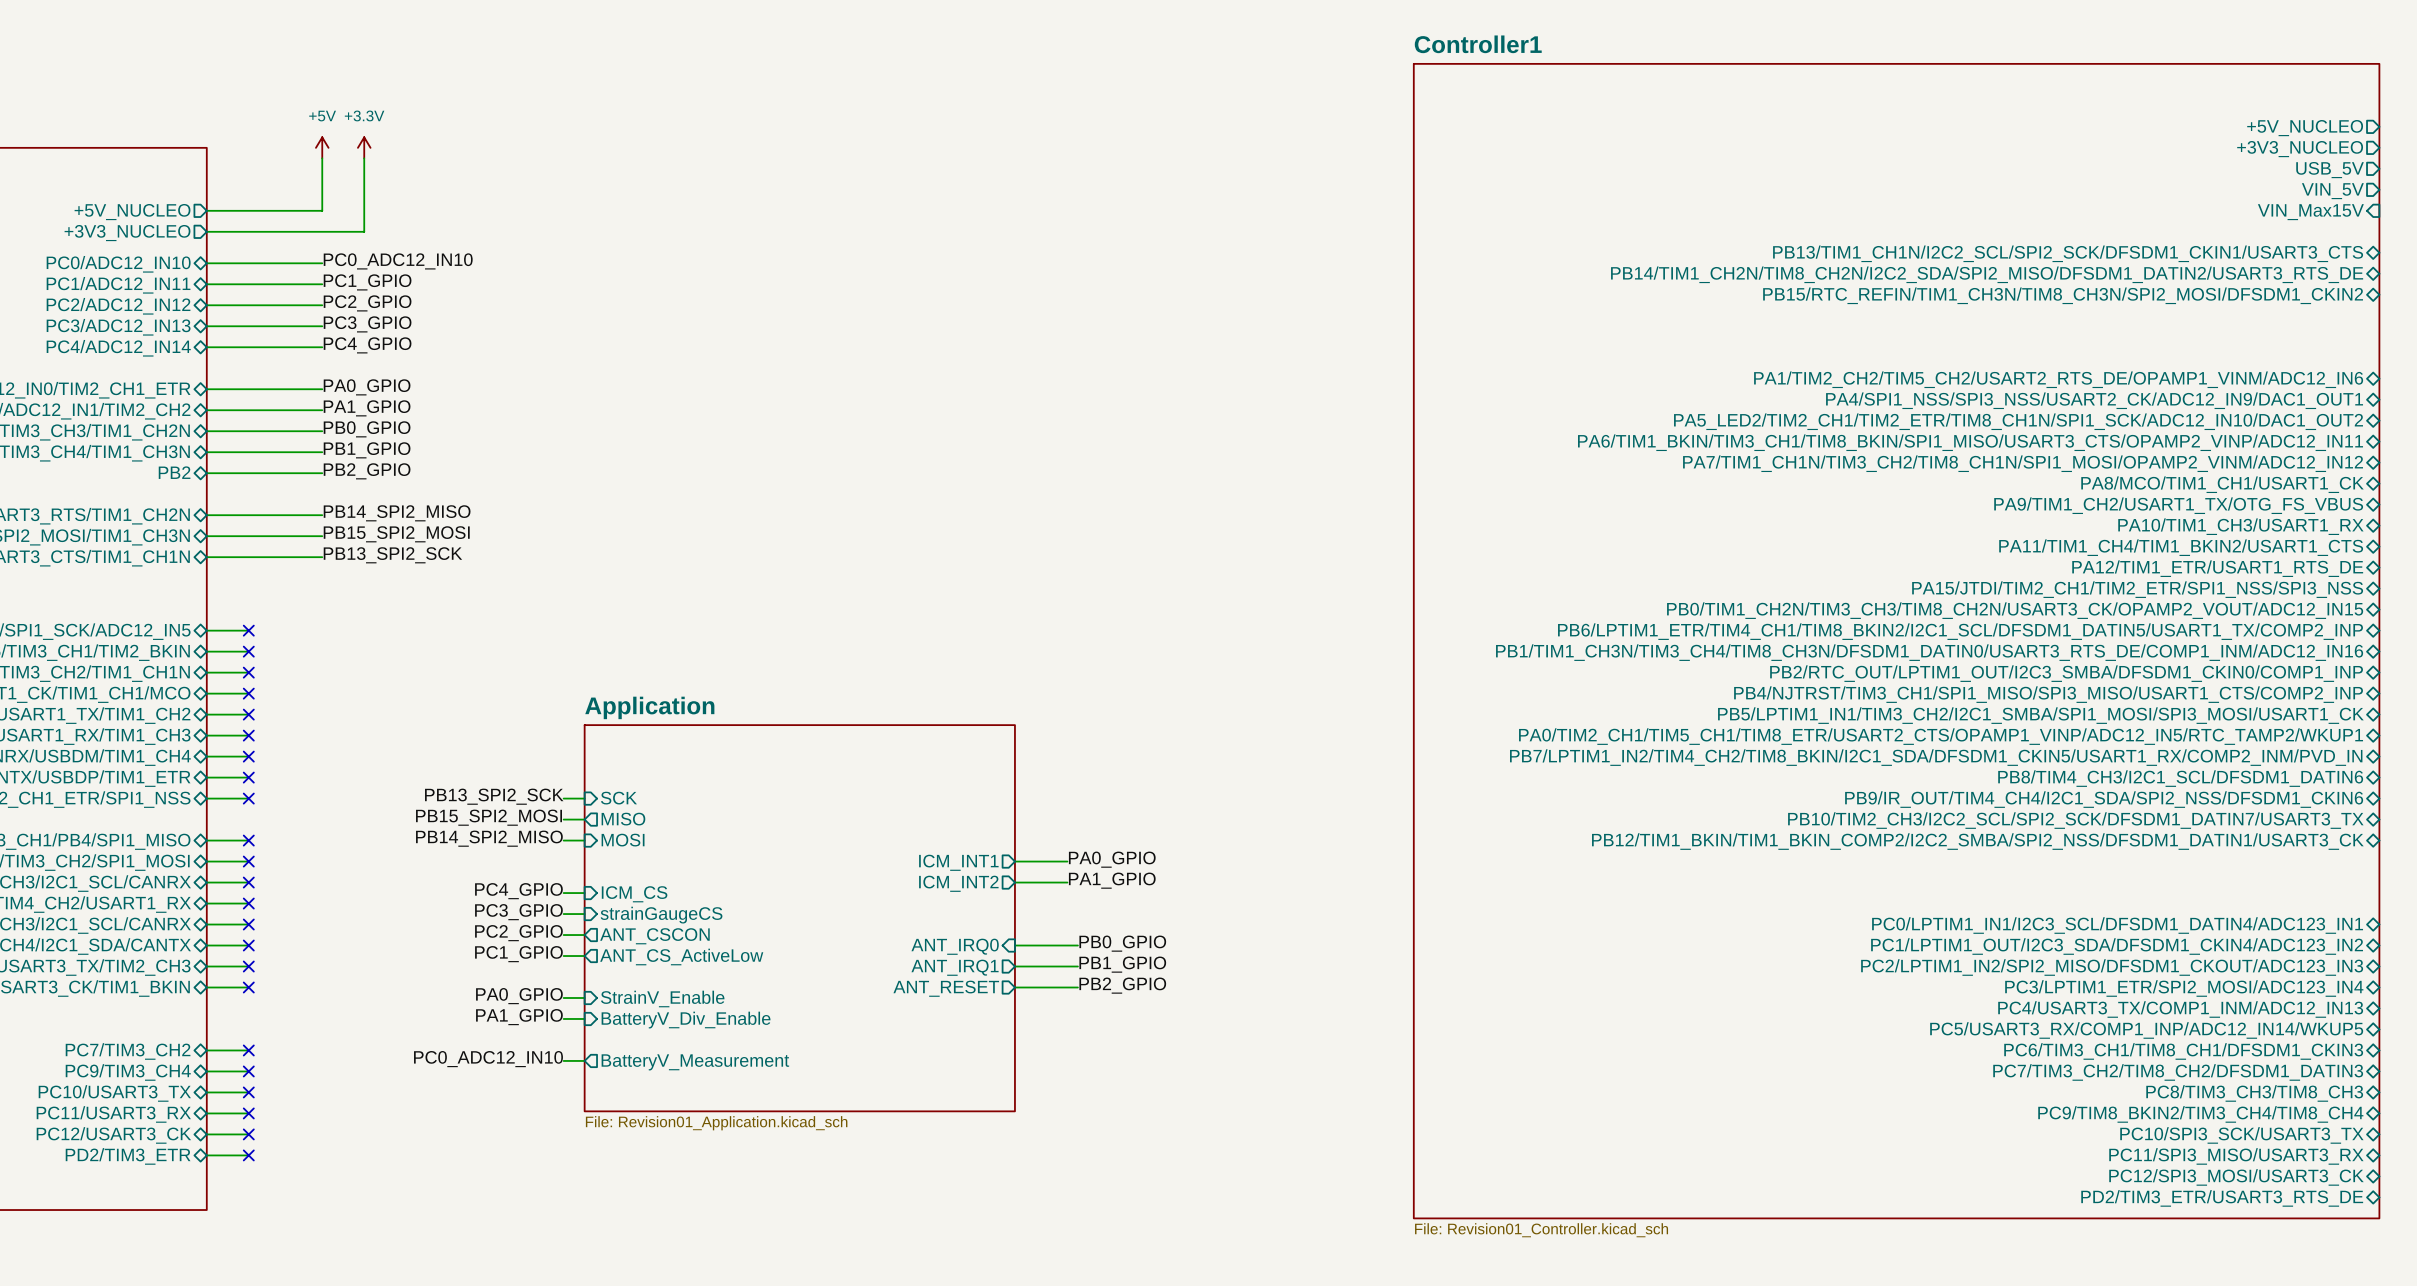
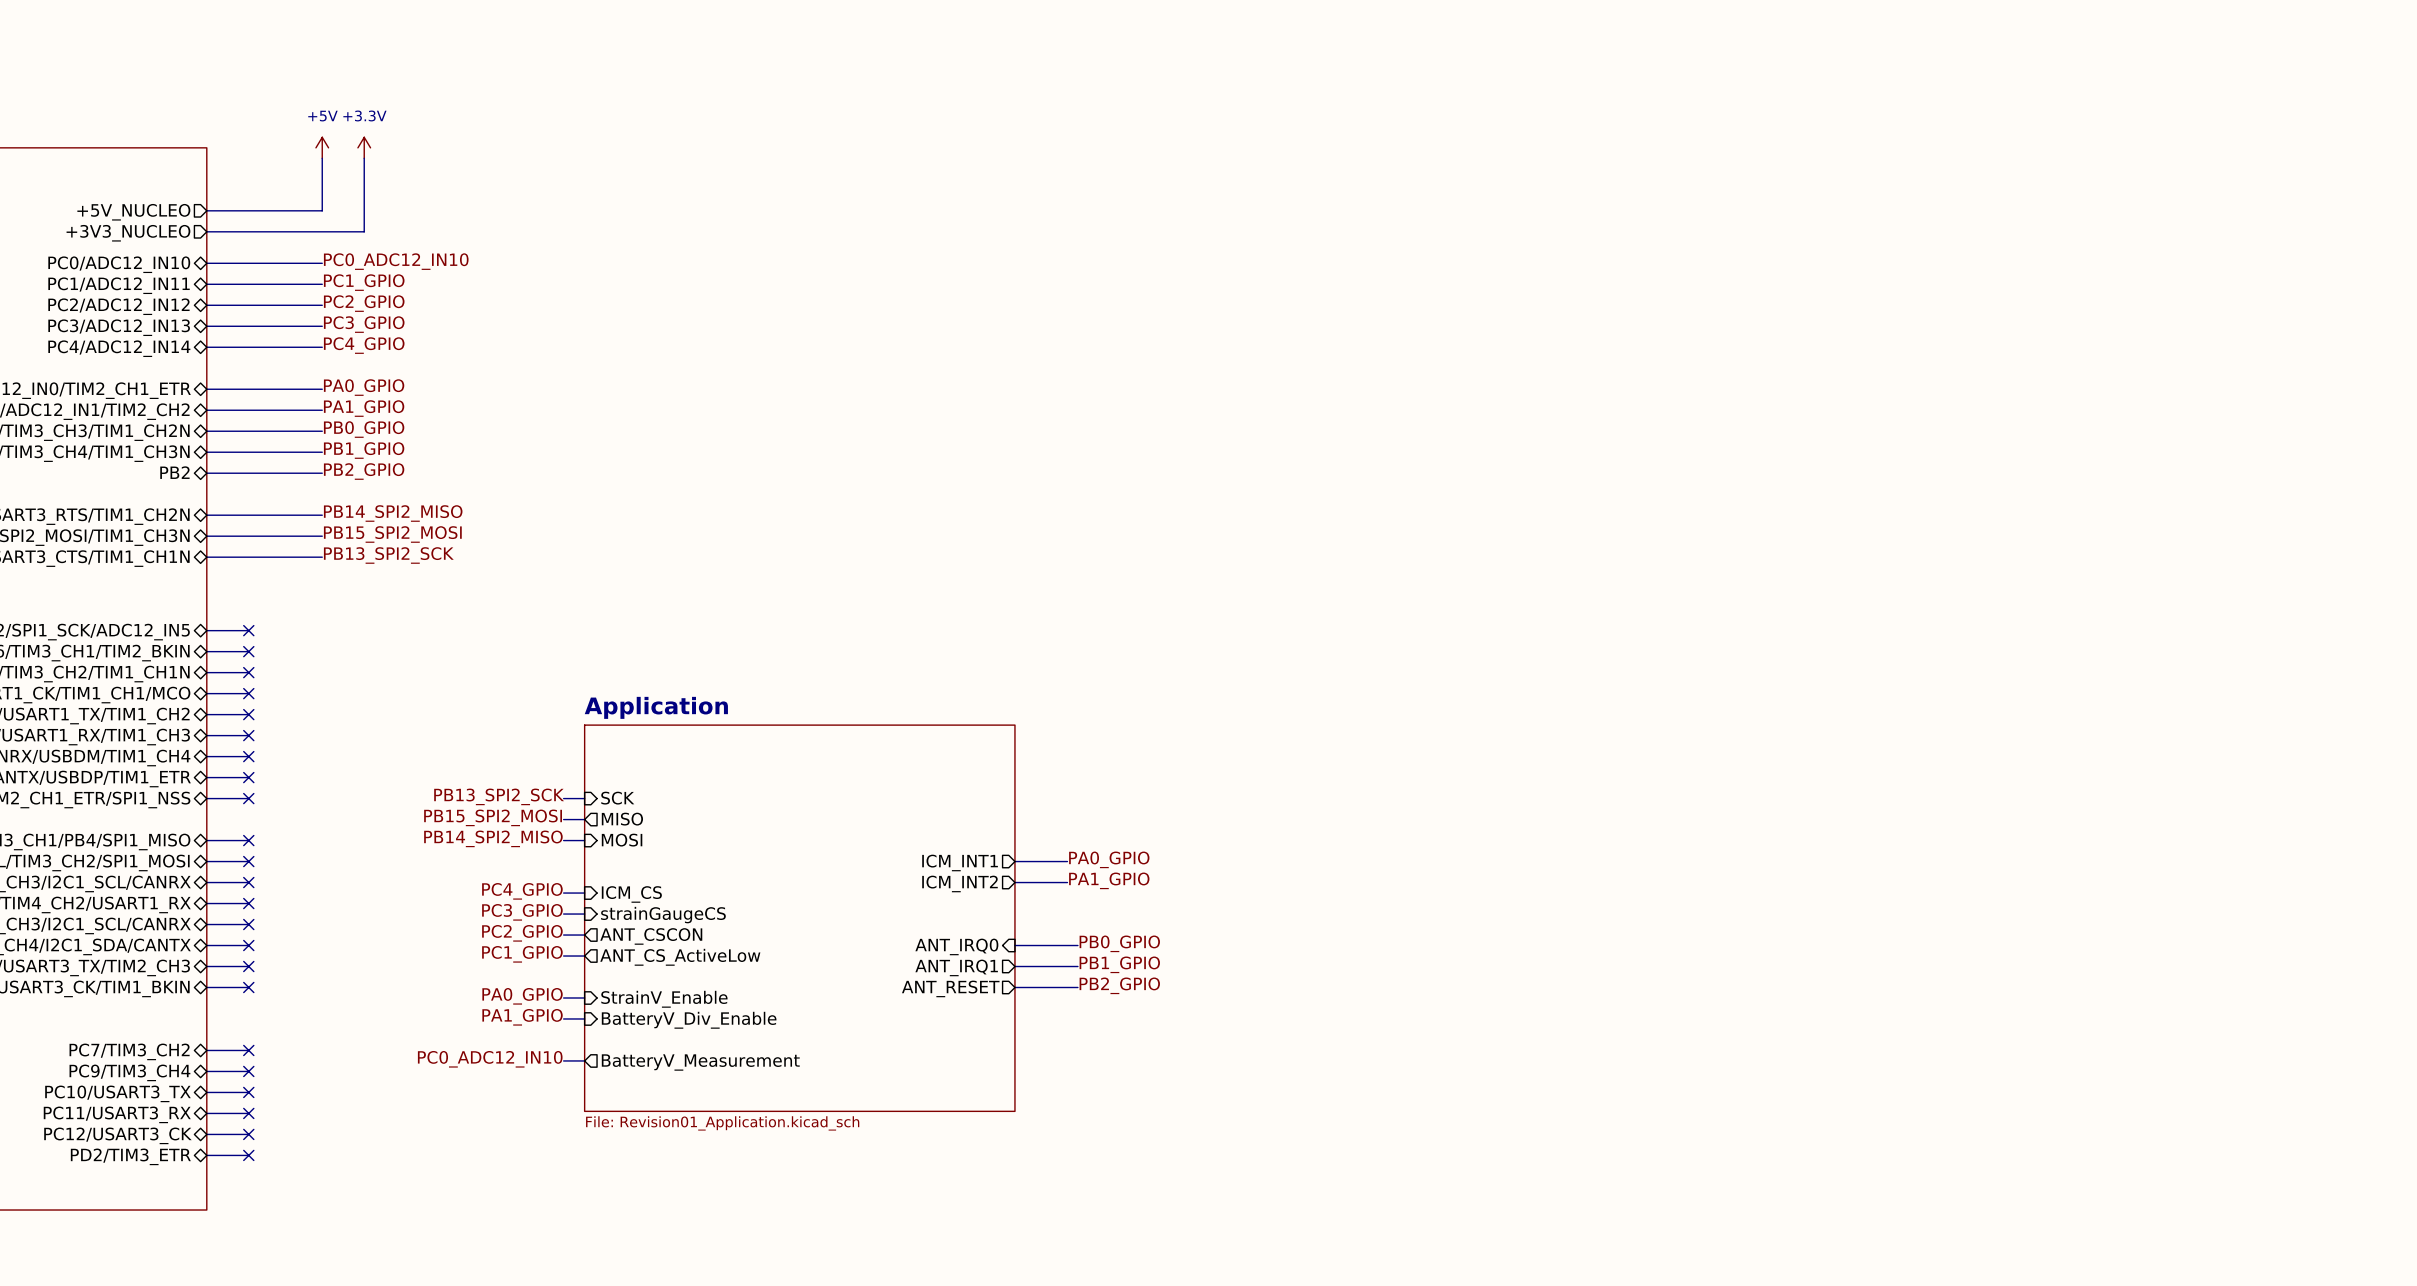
sheet pin: +5V_NUCLEO (2305, 128) -> none
sheet pin: +3V3_NUCLEO (2300, 149) -> none
sheet pin: USB_5V (2330, 170) -> none
sheet pin: VIN_5V (2332, 191) -> none
sheet pin: VIN_Max15V (2310, 212) -> none
sheet pin: PB13/TIM1_CH1N/I2C2_SCL/SPI2_SCK/DFSDM1_CKIN1/USART3_CTS (2068, 253) -> none
sheet pin: PB14/TIM1_CH2N/TIM8_CH2N/I2C2_SDA/SPI2_MISO/DFSDM1_DATIN2/USART3_RTS_DE (1987, 274) -> none
sheet pin: PB15/RTC_REFIN/TIM1_CH3N/TIM8_CH3N/SPI2_MOSI/DFSDM1_CKIN2 (2063, 295) -> none
sheet pin: PA1/TIM2_CH2/TIM5_CH2/USART2_RTS_DE/OPAMP1_VINM/ADC12_IN6 (2058, 379) -> none
sheet pin: PA4/SPI1_NSS/SPI3_NSS/USART2_CK/ADC12_IN9/DAC1_OUT1 (2094, 400) -> none
sheet pin: PA5_LED2/TIM2_CH1/TIM2_ETR/TIM8_CH1N/SPI1_SCK/ADC12_IN10/DAC1_OUT2 (2018, 421) -> none
sheet pin: PA6/TIM1_BKIN/TIM3_CH1/TIM8_BKIN/SPI1_MISO/USART3_CTS/OPAMP2_VINP/ADC12_IN11 (1970, 442) -> none
sheet pin: PA7/TIM1_CH1N/TIM3_CH2/TIM8_CH1N/SPI1_MOSI/OPAMP2_VINM/ADC12_IN12 (2023, 463) -> none
sheet pin: PA8/MCO/TIM1_CH1/USART1_CK (2222, 484) -> none
sheet pin: PA9/TIM1_CH2/USART1_TX/OTG_FS_VBUS (2178, 505) -> none
sheet pin: PA10/TIM1_CH3/USART1_RX (2240, 526) -> none
sheet pin: PA11/TIM1_CH4/TIM1_BKIN2/USART1_CTS (2181, 547) -> none
sheet pin: PA12/TIM1_ETR/USART1_RTS_DE (2217, 568) -> none
sheet pin: PA15/JTDI/TIM2_CH1/TIM2_ETR/SPI1_NSS/SPI3_NSS (2137, 589) -> none
sheet pin: PB0/TIM1_CH2N/TIM3_CH3/TIM8_CH2N/USART3_CK/OPAMP2_VOUT/ADC12_IN15 (2015, 610) -> none
sheet pin: PB6/LPTIM1_ETR/TIM4_CH1/TIM8_BKIN2/I2C1_SCL/DFSDM1_DATIN5/USART1_TX/COMP2_INP (1960, 631) -> none
sheet Controller1: File: Revision01_Controller.kicad_sch (1896, 641) -> none
sheet pin: PB1/TIM1_CH3N/TIM3_CH4/TIM8_CH3N/DFSDM1_DATIN0/USART3_RTS_DE/COMP1_INM/ADC12_IN16 (1929, 652) -> none
sheet pin: PB2/RTC_OUT/LPTIM1_OUT/I2C3_SMBA/DFSDM1_CKIN0/COMP1_INP (2066, 673) -> none
sheet pin: PB4/NJTRST/TIM3_CH1/SPI1_MISO/SPI3_MISO/USART1_CTS/COMP2_INP (2048, 694) -> none
sheet pin: PB5/LPTIM1_IN1/TIM3_CH2/I2C1_SMBA/SPI1_MOSI/SPI3_MOSI/USART1_CK (2040, 715) -> none
sheet pin: PA0/TIM2_CH1/TIM5_CH1/TIM8_ETR/USART2_CTS/OPAMP1_VINP/ADC12_IN5/RTC_TAMP2/WKUP1 (1941, 736) -> none
sheet pin: PB7/LPTIM1_IN2/TIM4_CH2/TIM8_BKIN/I2C1_SDA/DFSDM1_CKIN5/USART1_RX/COMP2_INM/PVD_IN (1936, 757) -> none
sheet pin: PB8/TIM4_CH3/I2C1_SCL/DFSDM1_DATIN6 (2180, 778) -> none
sheet pin: PB9/IR_OUT/TIM4_CH4/I2C1_SDA/SPI2_NSS/DFSDM1_CKIN6 (2104, 799) -> none
sheet pin: PB10/TIM2_CH3/I2C2_SCL/SPI2_SCK/DFSDM1_DATIN7/USART3_TX (2075, 820) -> none
sheet pin: PB12/TIM1_BKIN/TIM1_BKIN_COMP2/I2C2_SMBA/SPI2_NSS/DFSDM1_DATIN1/USART3_CK (1977, 841) -> none
sheet pin: PC0/LPTIM1_IN1/I2C3_SCL/DFSDM1_DATIN4/ADC123_IN1 (2117, 925) -> none
sheet pin: PC1/LPTIM1_OUT/I2C3_SDA/DFSDM1_CKIN4/ADC123_IN2 (2117, 946) -> none
sheet pin: PC2/LPTIM1_IN2/SPI2_MISO/DFSDM1_CKOUT/ADC123_IN3 (2112, 967) -> none
sheet pin: PC3/LPTIM1_ETR/SPI2_MOSI/ADC123_IN4 (2184, 988) -> none
sheet pin: PC4/USART3_TX/COMP1_INM/ADC12_IN13 (2180, 1009) -> none
sheet pin: PC5/USART3_RX/COMP1_INP/ADC12_IN14/WKUP5 (2146, 1030) -> none
sheet pin: PC6/TIM3_CH1/TIM8_CH1/DFSDM1_CKIN3 (2183, 1051) -> none
sheet pin: PC7/TIM3_CH2/TIM8_CH2/DFSDM1_DATIN3 (2178, 1072) -> none
sheet pin: PC8/TIM3_CH3/TIM8_CH3 (2254, 1093) -> none
sheet pin: PC9/TIM8_BKIN2/TIM3_CH4/TIM8_CH4 (2200, 1114) -> none
sheet pin: PC10/SPI3_SCK/USART3_TX (2241, 1135) -> none
sheet pin: PC11/SPI3_MISO/USART3_RX (2236, 1156) -> none
sheet pin: PC12/SPI3_MOSI/USART3_CK (2236, 1177) -> none
sheet pin: PD2/TIM3_ETR/USART3_RTS_DE (2222, 1198) -> none

